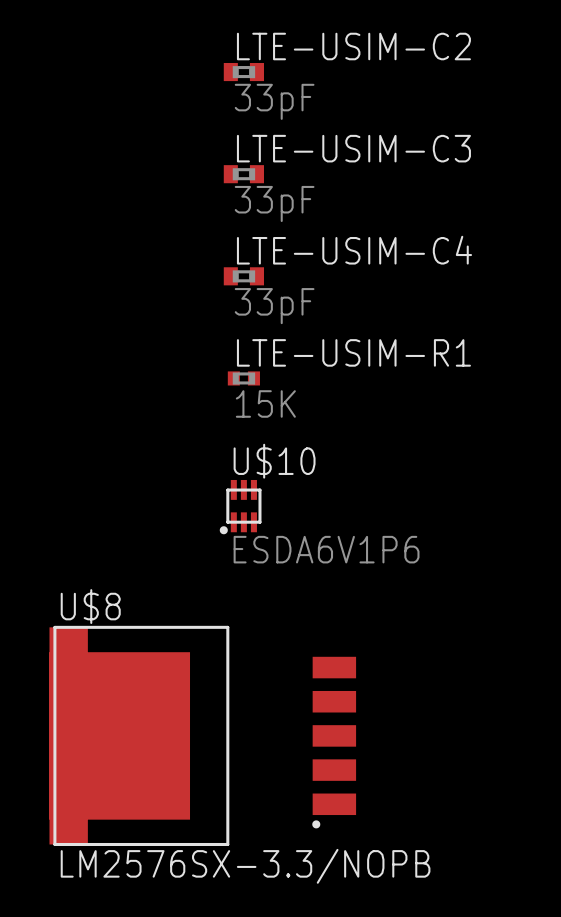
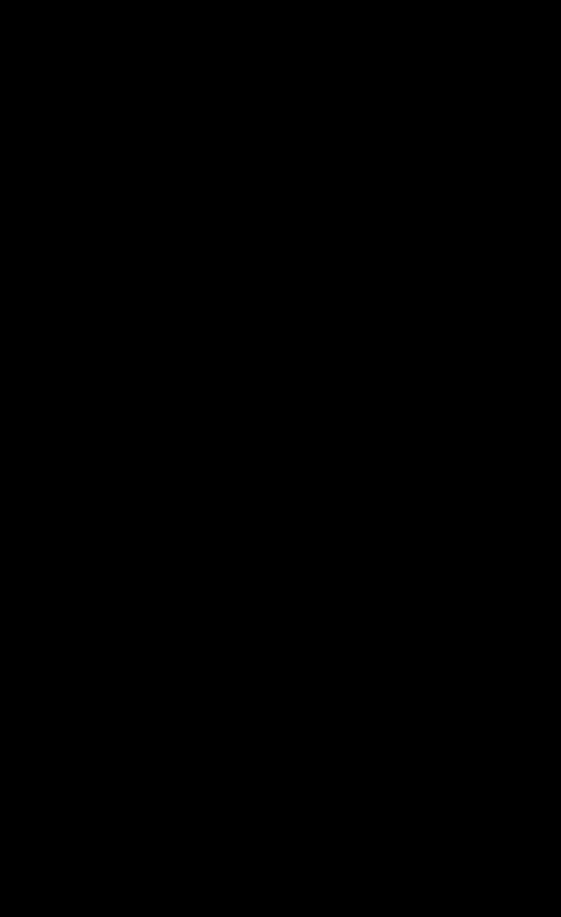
LTE-USIM-C2: 33pF (243, 72) -> none
LTE-USIM-C3: 33pF (243, 174) -> none
LTE-USIM-C4: 33pF (243, 276) -> none
LTE-USIM-R1: 15K (243, 378) -> none
U$10: ESDA6V1P6 (240, 507) -> none
U$8: LM2576SX-3.3/NOPB (202, 735) -> none

